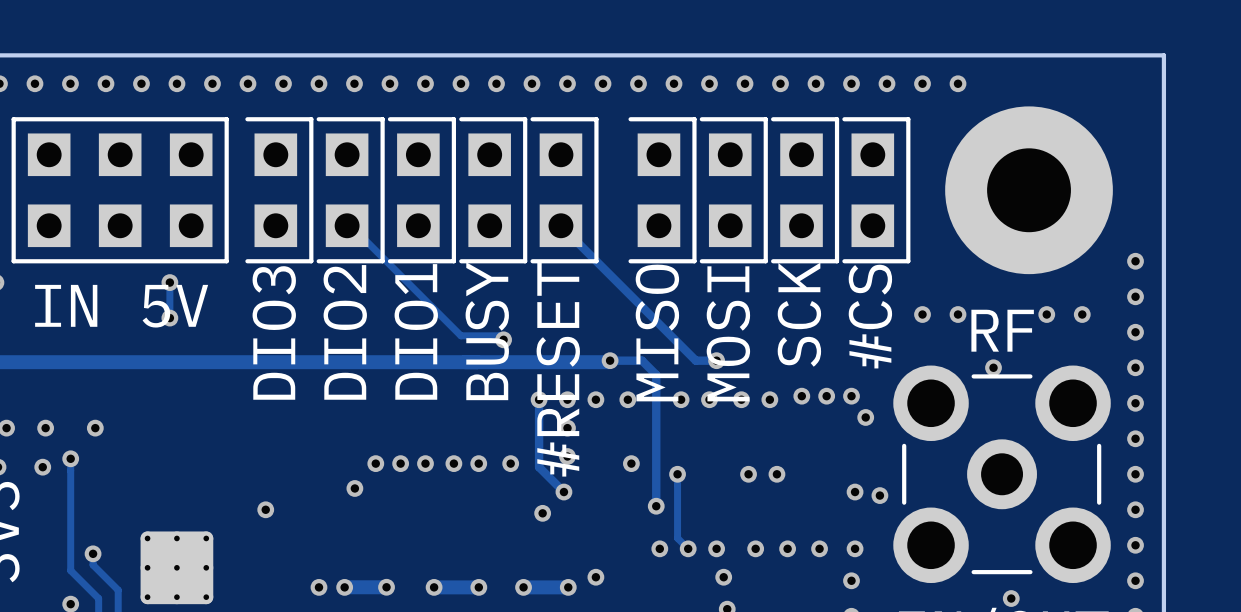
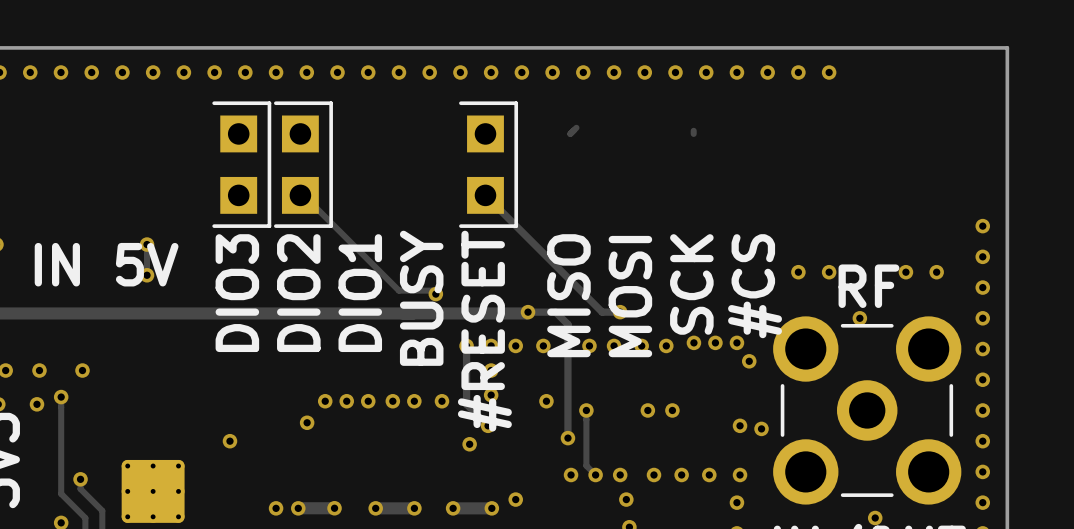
part: (120, 190) -> none
part: (421, 190) -> none
part: (493, 190) -> none
part: (662, 190) -> none
part: (733, 190) -> none
part: (805, 190) -> none
part: (876, 190) -> none
part: (1029, 190) -> none

